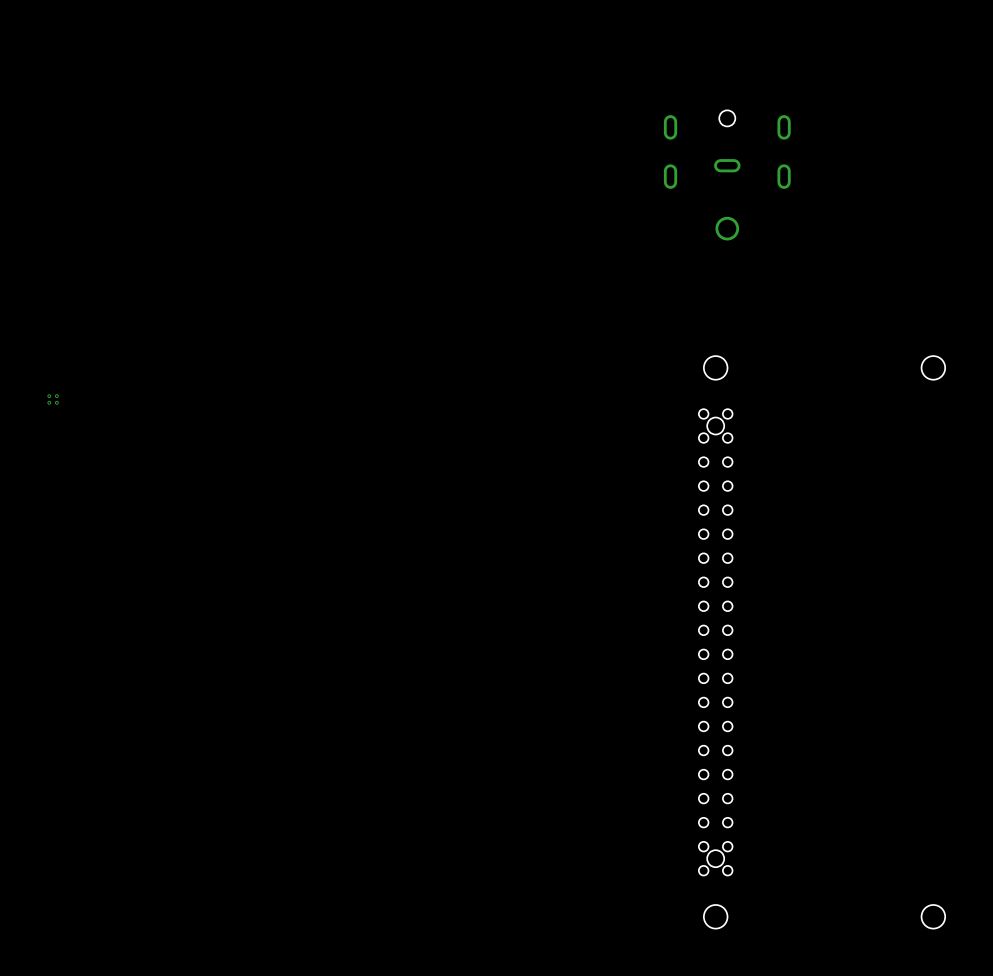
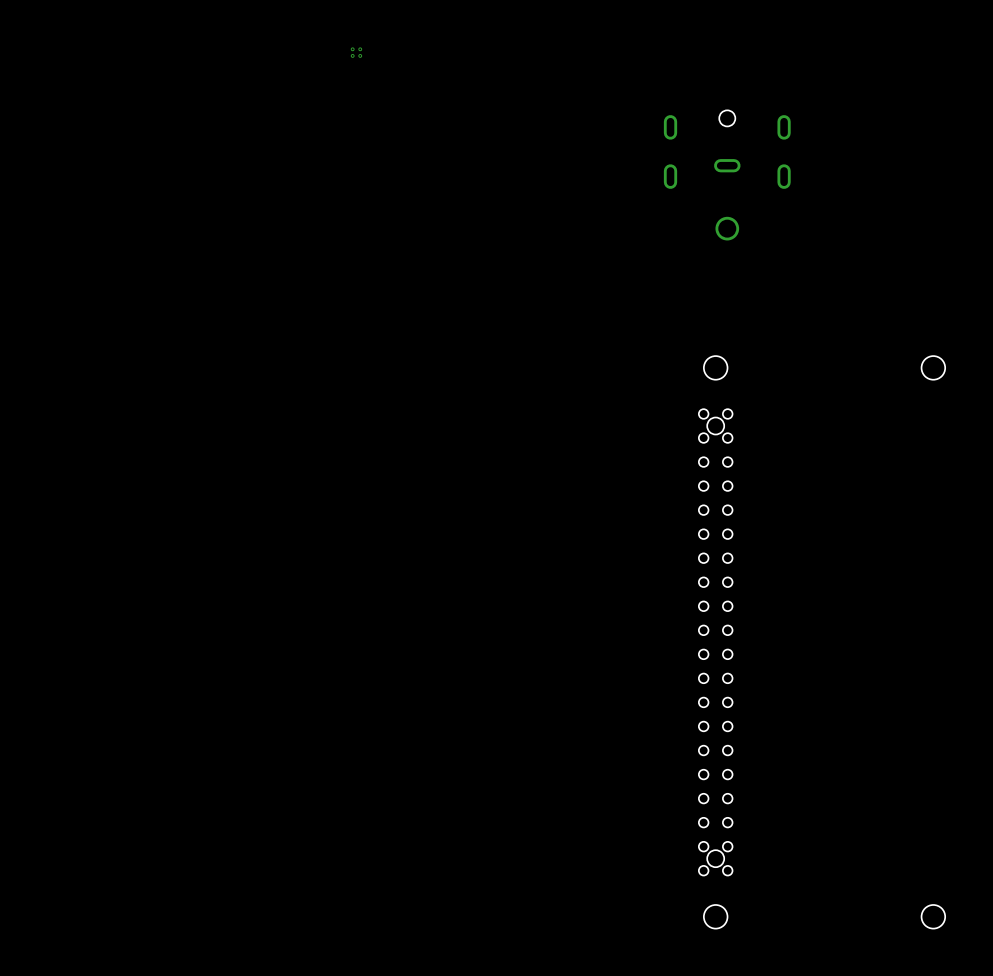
part: none -> (356, 52)
part: (53, 399) -> none

